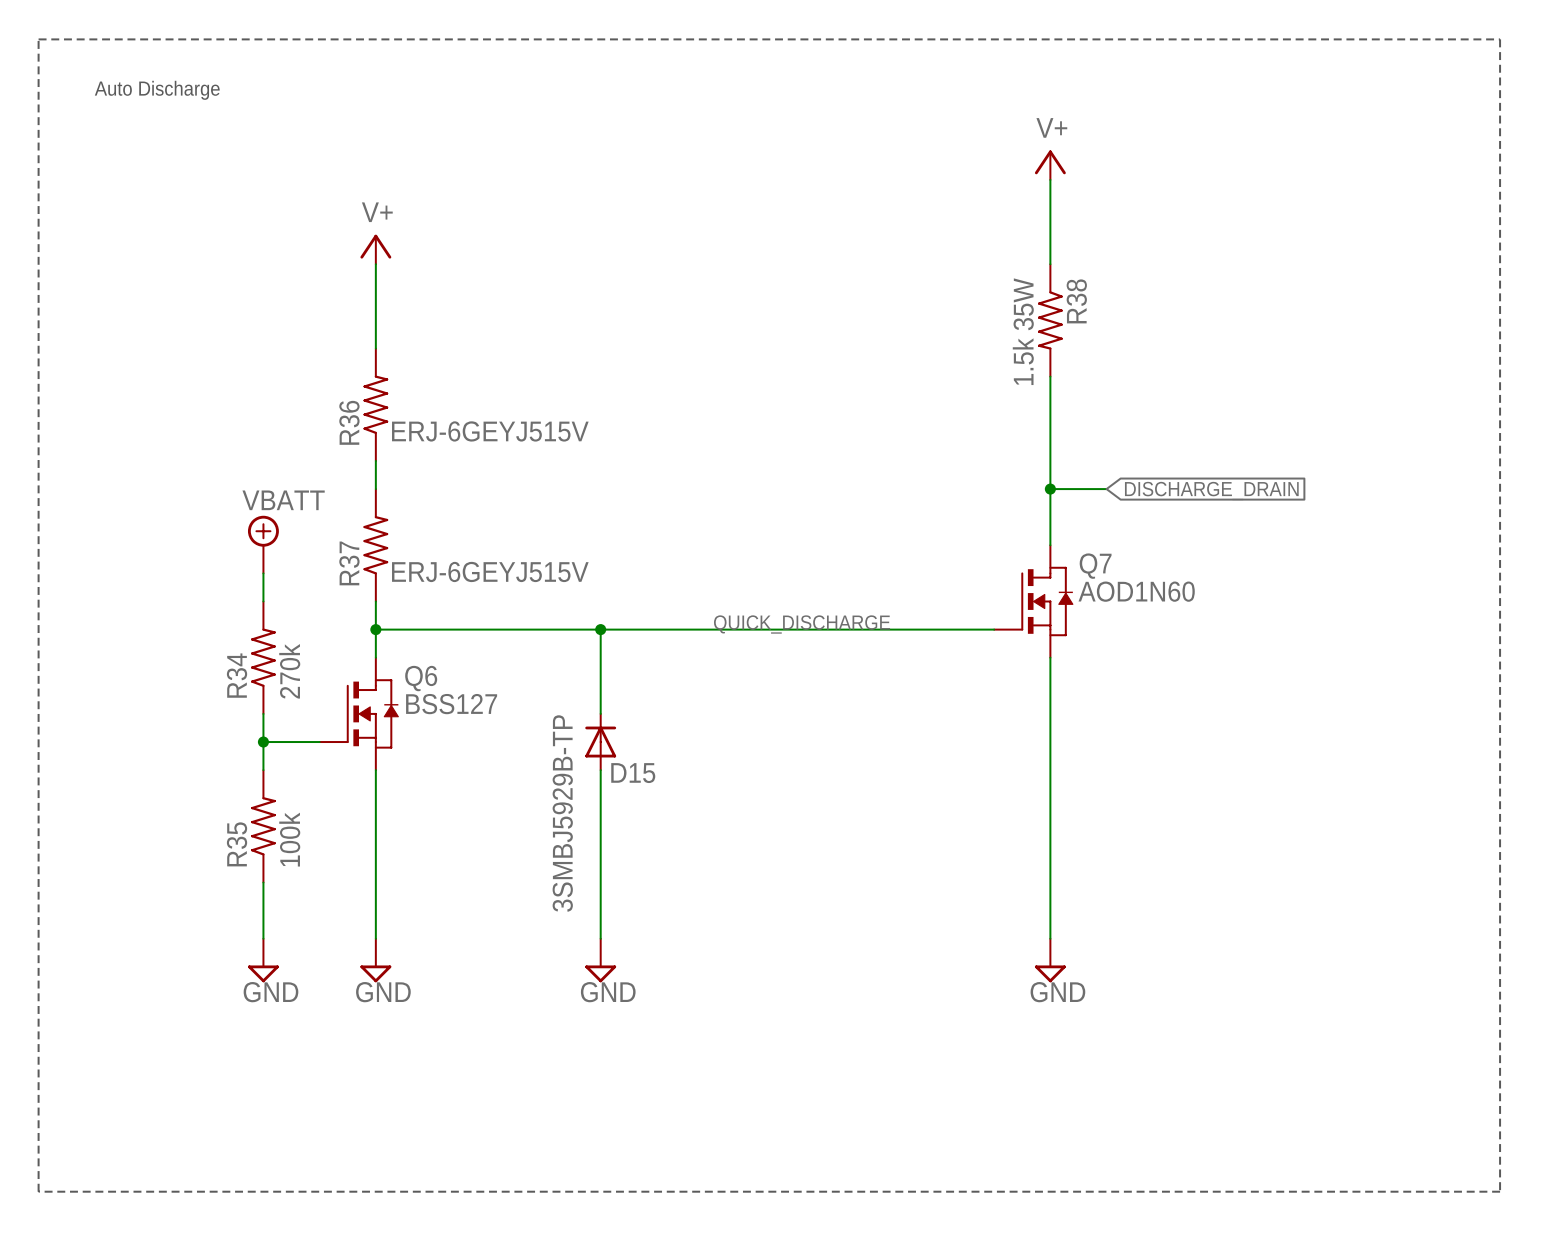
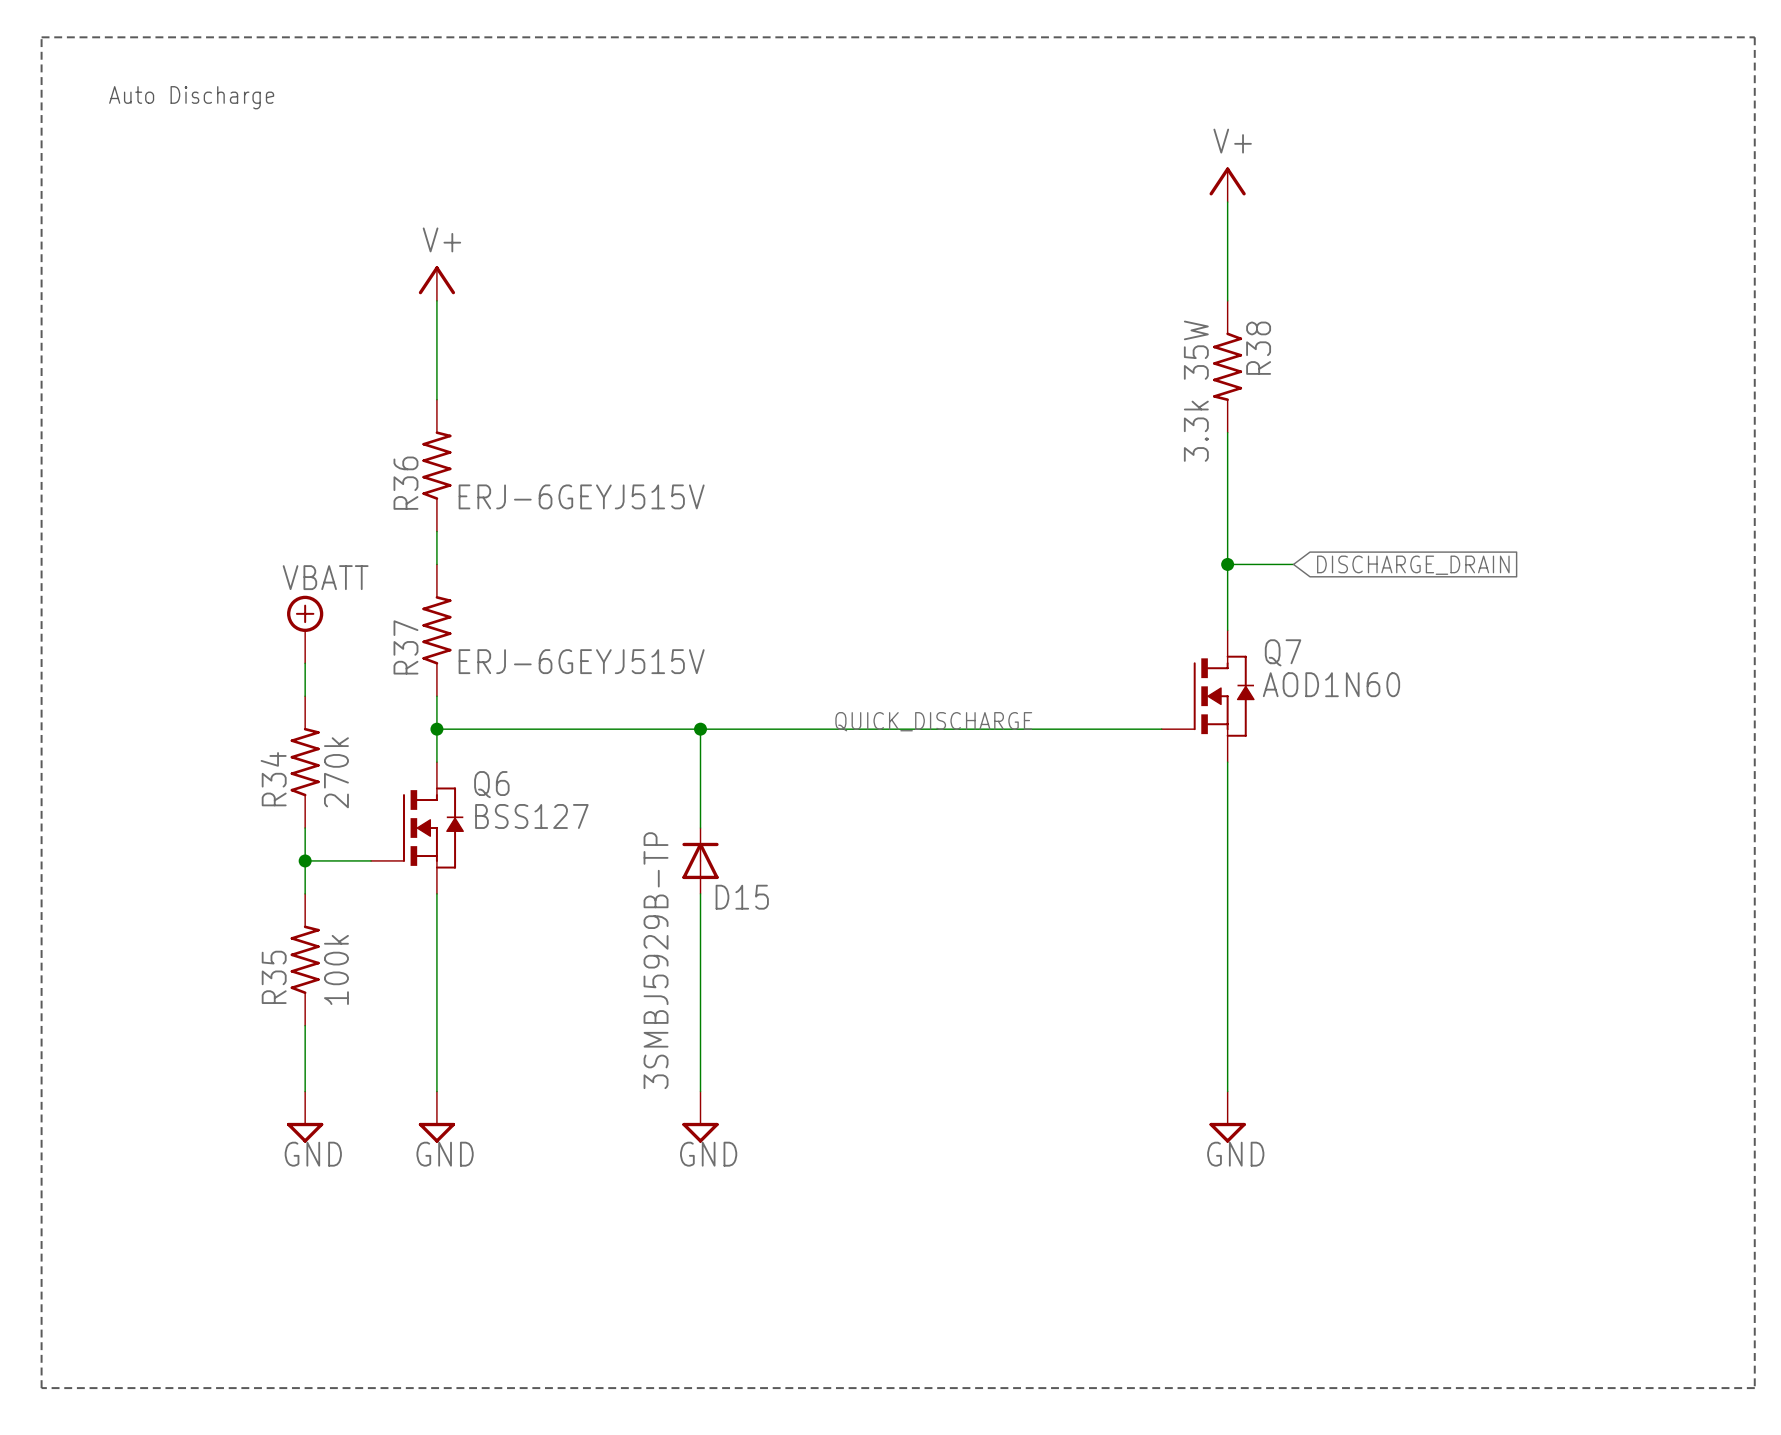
R38 value: 1.5k 35W (1023, 331) -> 3.3k 35W (1196, 391)

